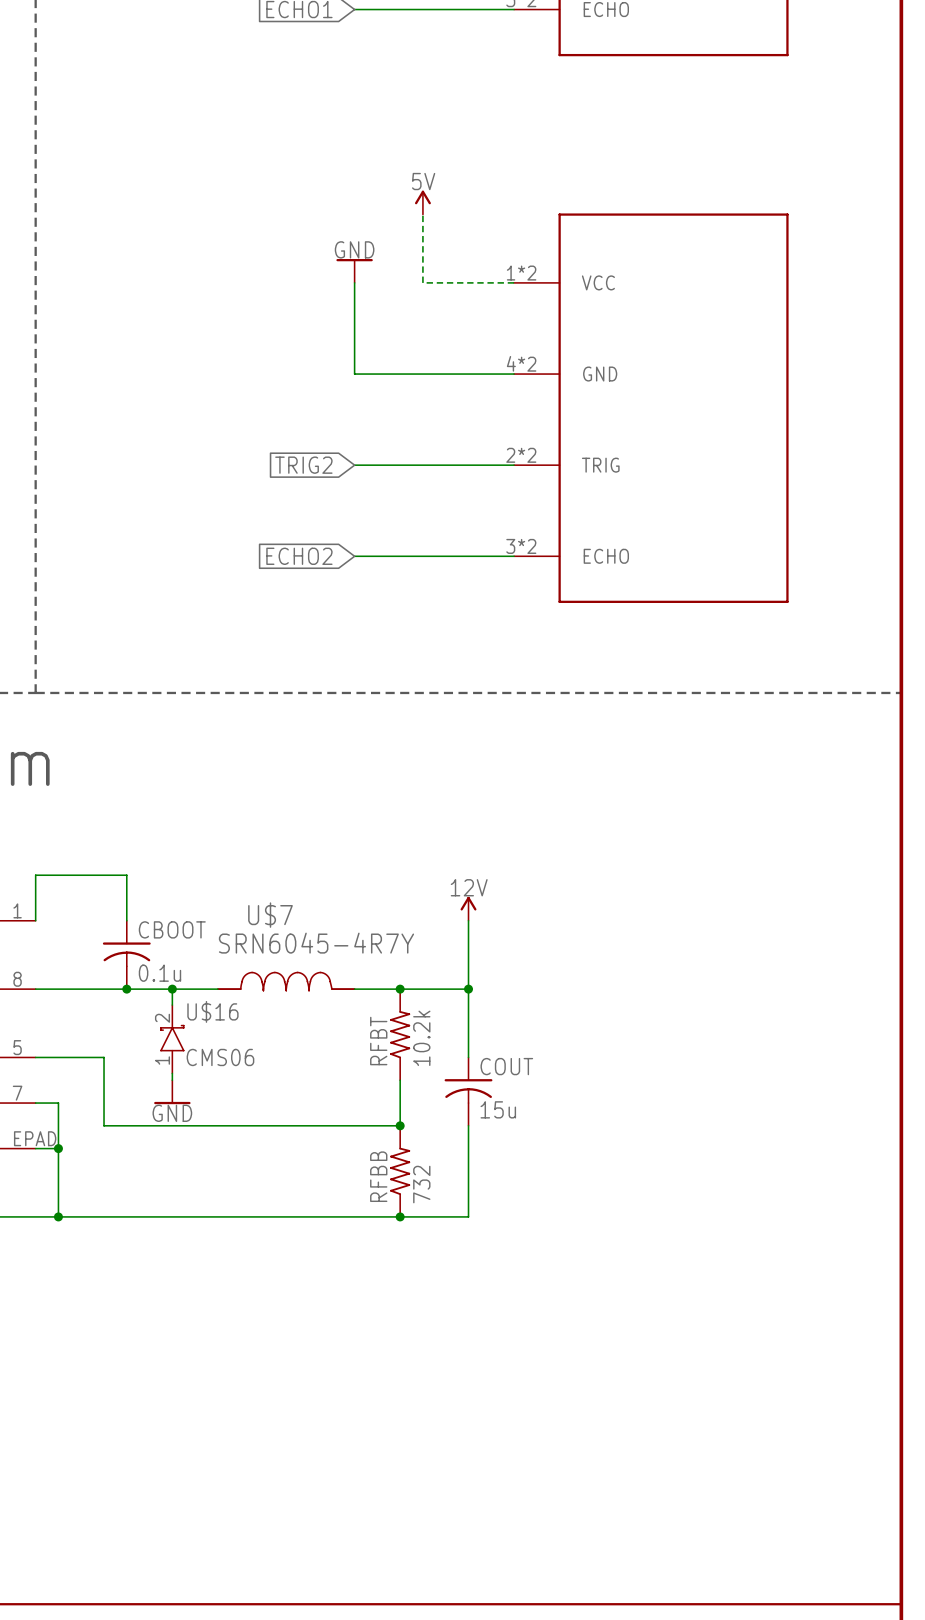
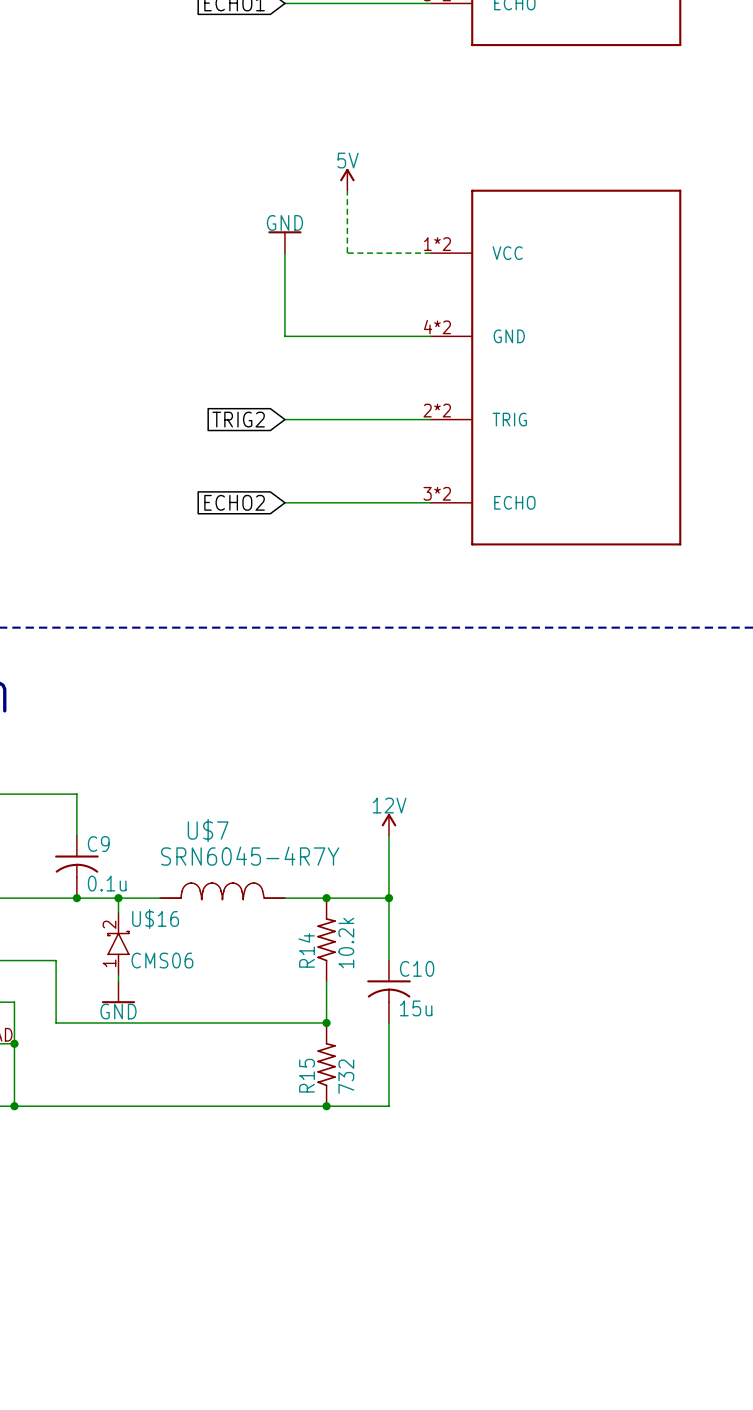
CBOOT name: CBOOT (172, 929) -> C9 (98, 844)
RFBT name: RFBT (378, 1041) -> R14 (306, 950)
COUT name: COUT (506, 1066) -> C10 (417, 968)
RFBB name: RFBB (378, 1176) -> R15 (307, 1075)

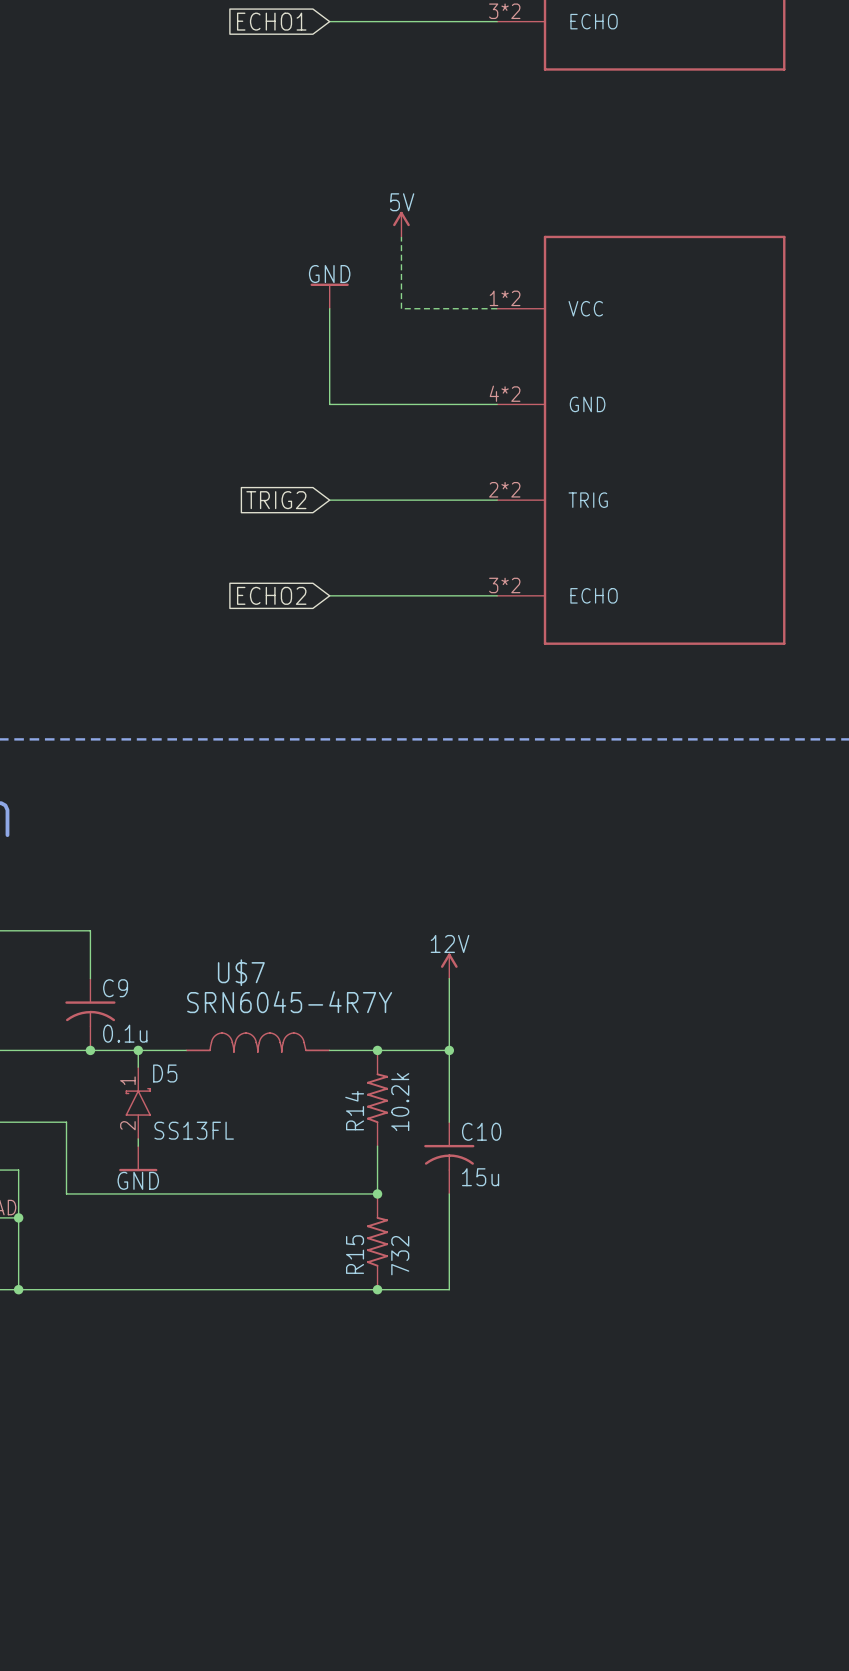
U$16 name: U$16 (155, 918) -> D5 (165, 1073)
U$16 pin number: 2 (109, 924) -> 1 (127, 1080)
U$16 value: CMS06 (162, 960) -> SS13FL (194, 1130)
U$16 pin number: 1 (109, 963) -> 2 (127, 1125)

